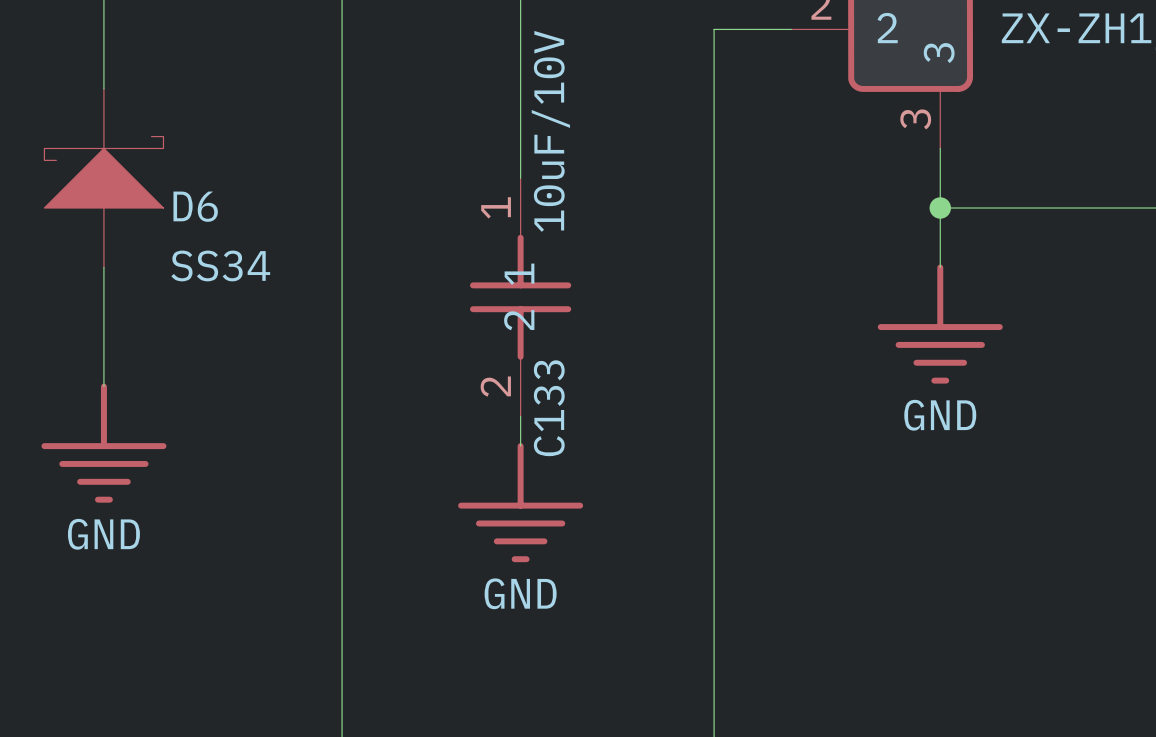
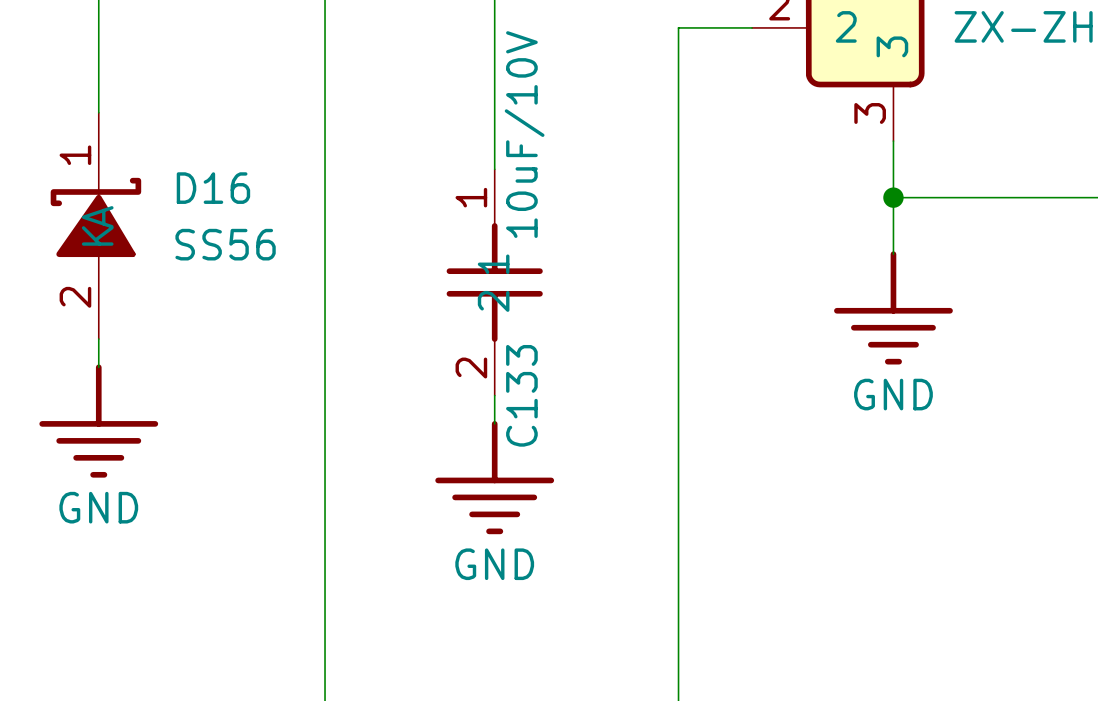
D6: SS34 (103, 178) -> none
D16: none -> SS56 (95, 225)

